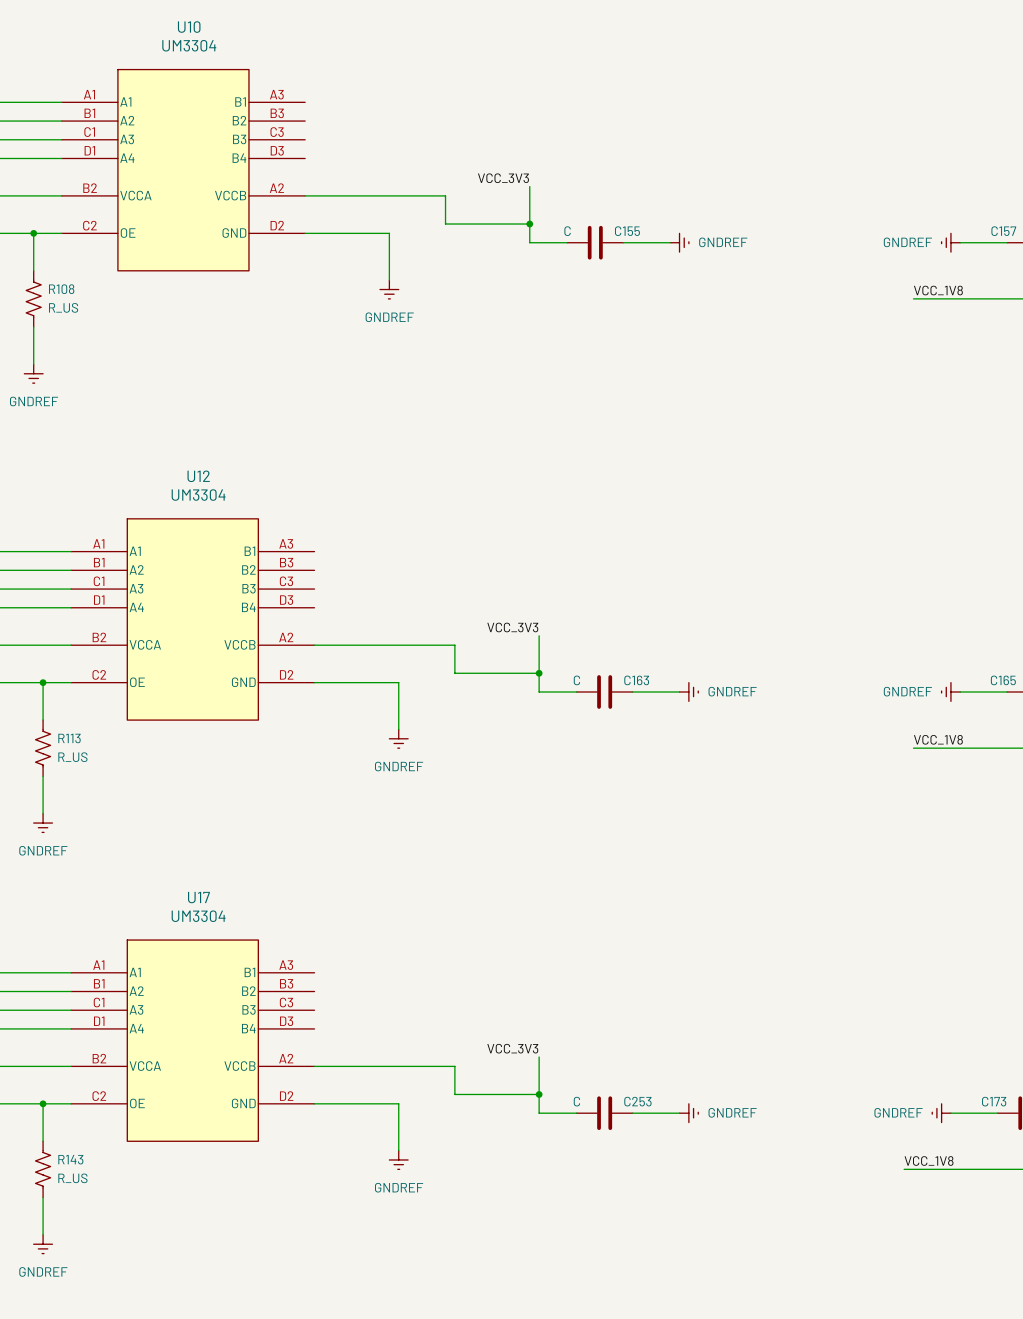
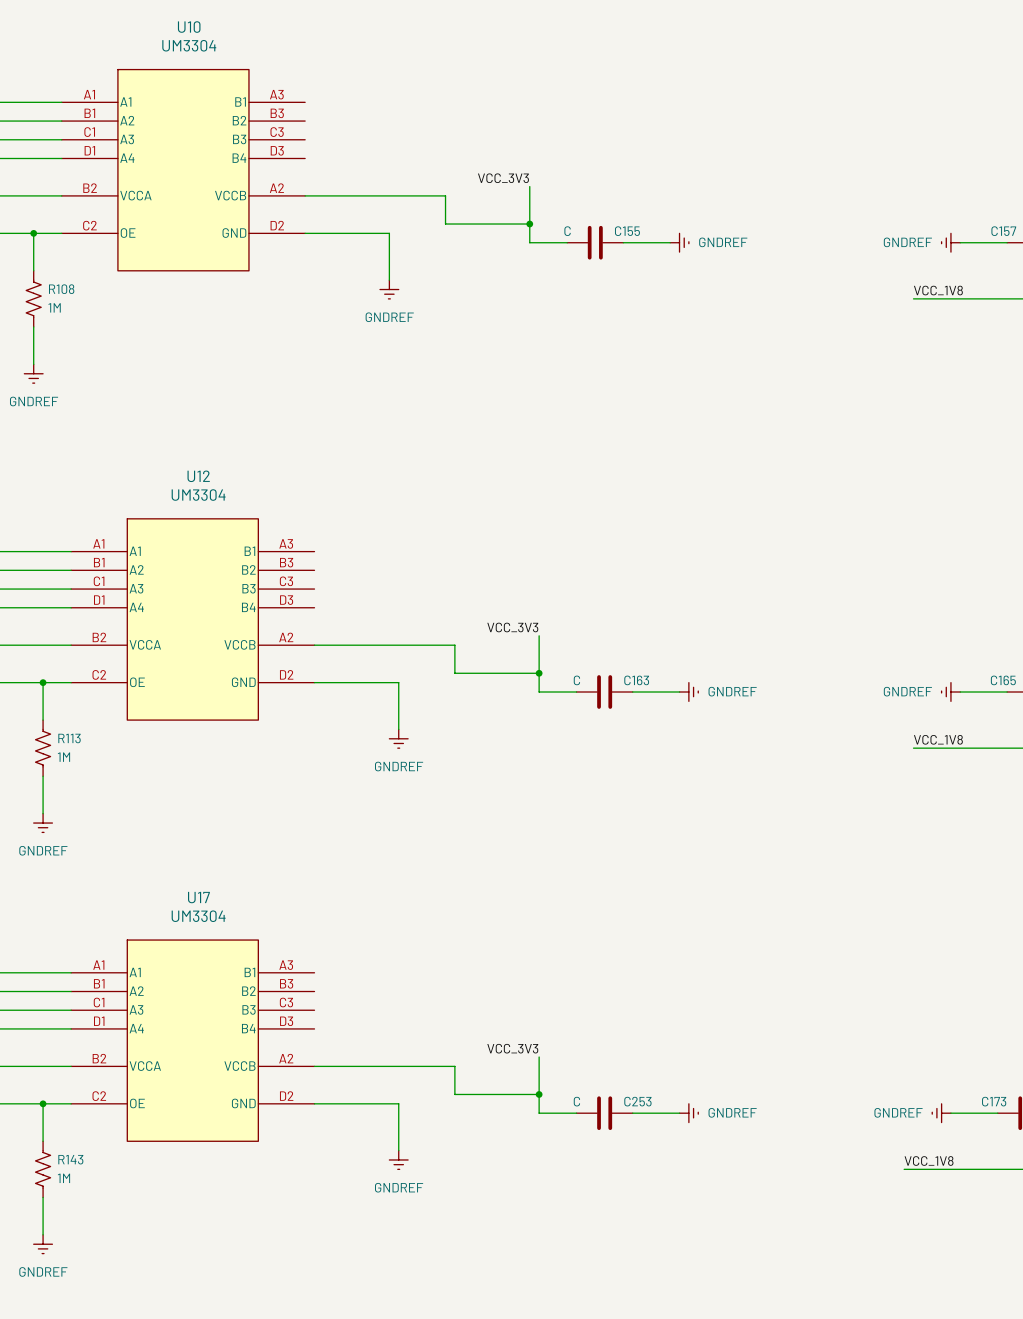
R108 value: R_US (63, 307) -> 1M (54, 307)
R113 value: R_US (72, 757) -> 1M (63, 757)
R143 value: R_US (72, 1178) -> 1M (63, 1178)

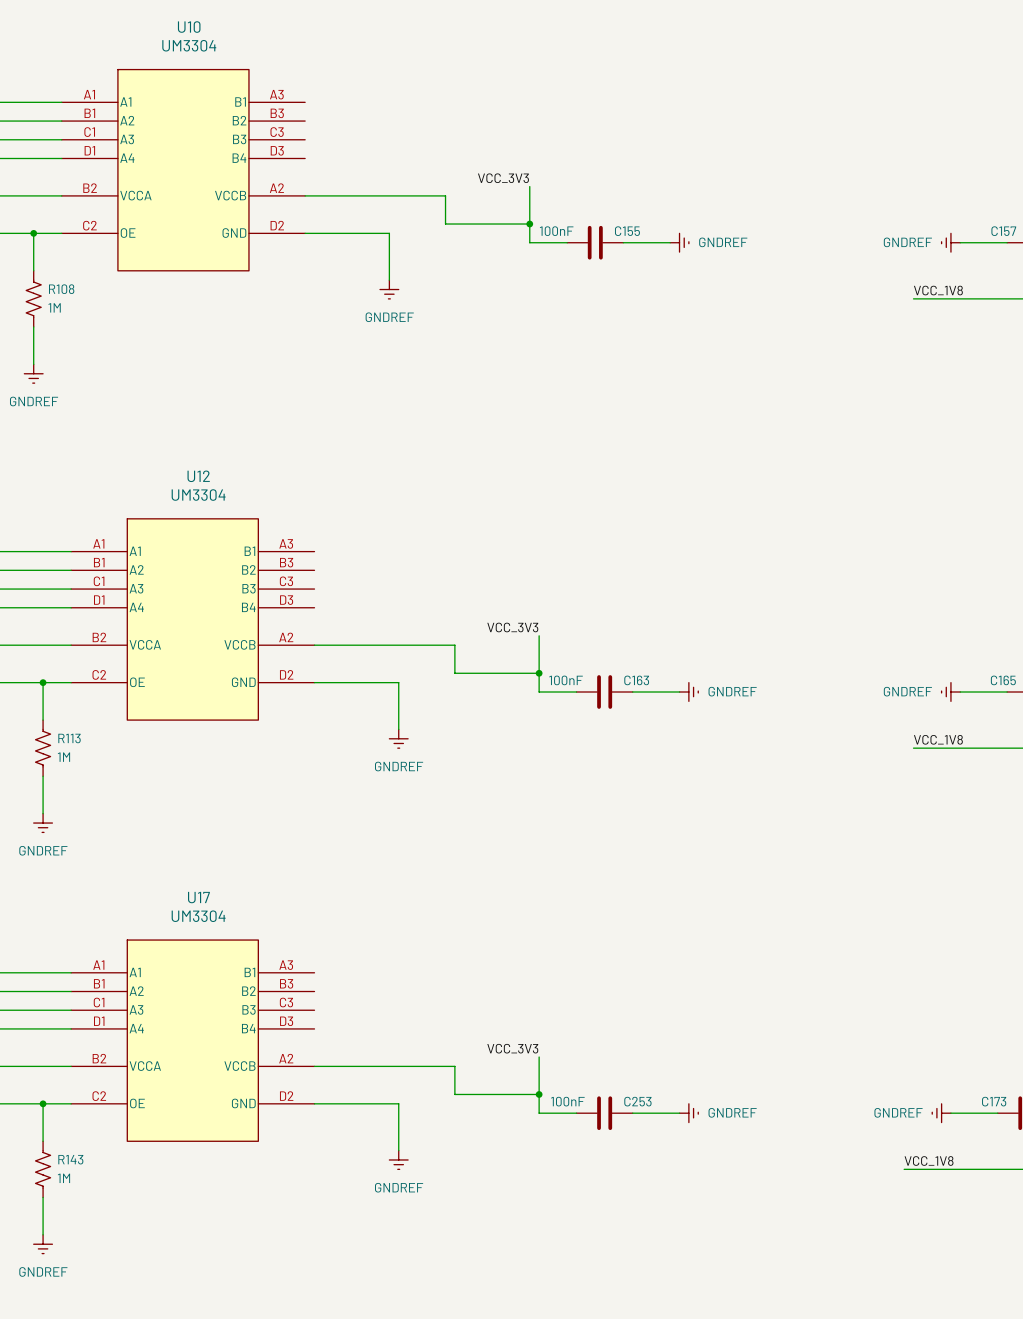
C155 value: C (567, 231) -> 100nF (556, 231)
C163 value: C (576, 680) -> 100nF (566, 680)
C253 value: C (576, 1101) -> 100nF (567, 1101)

